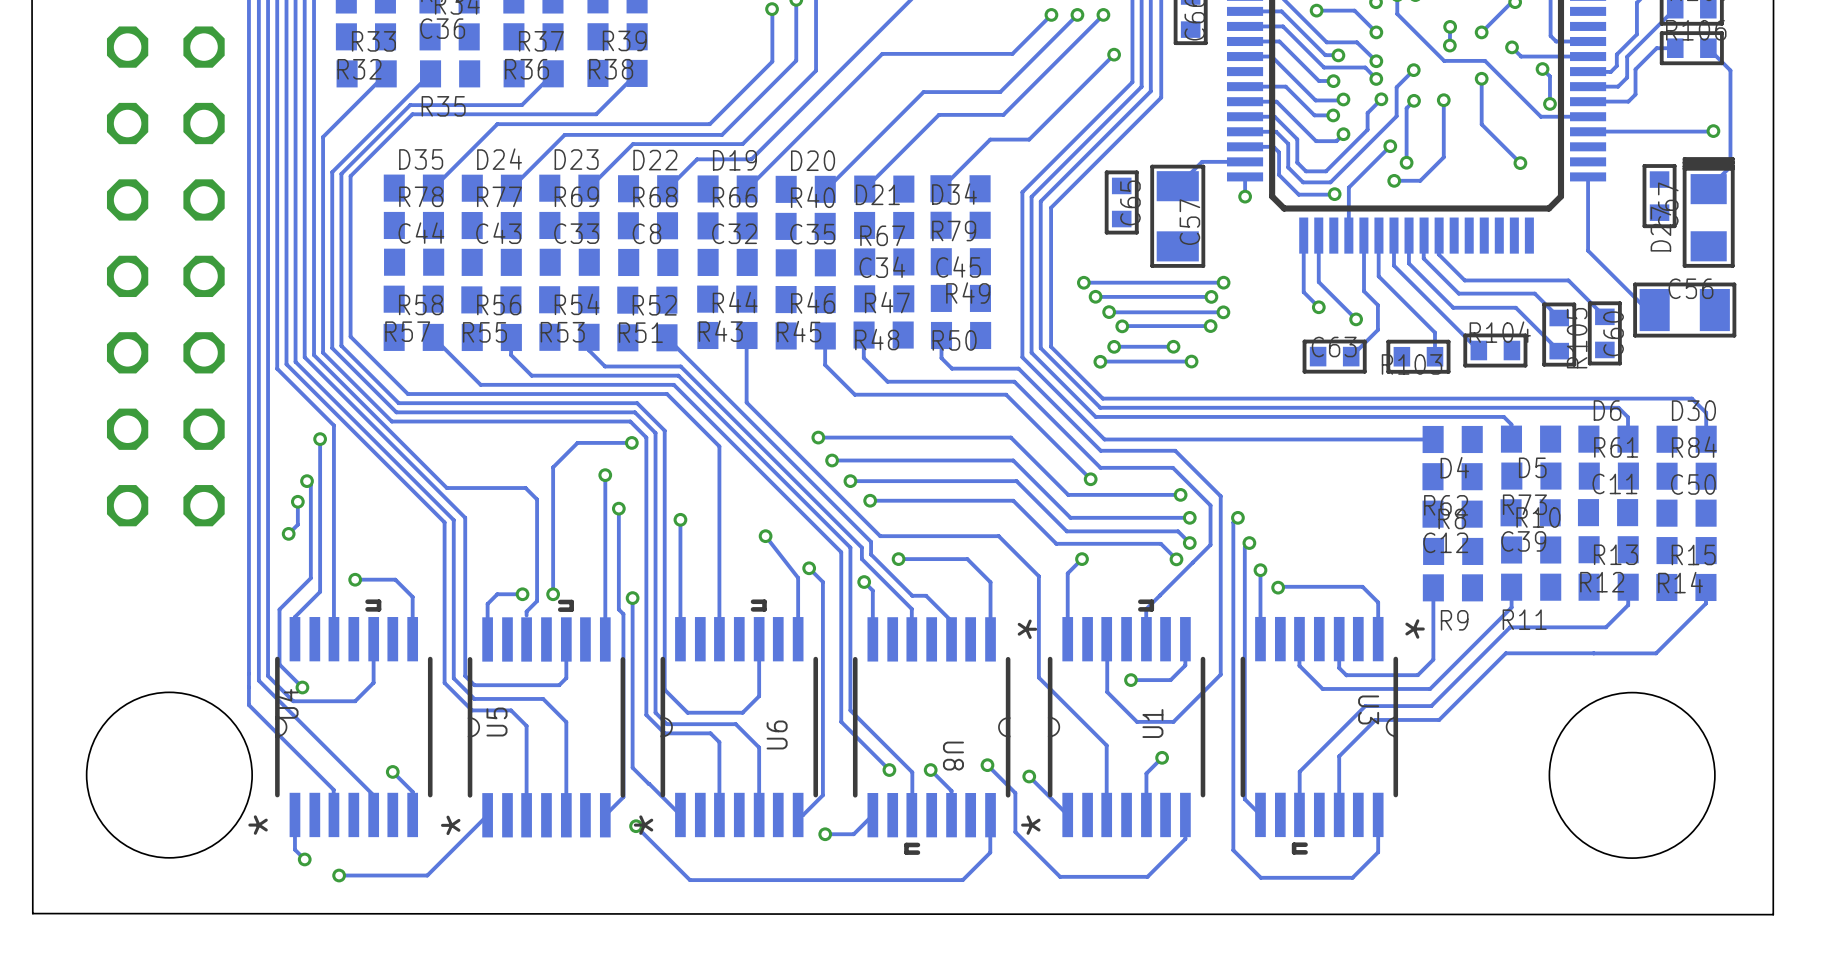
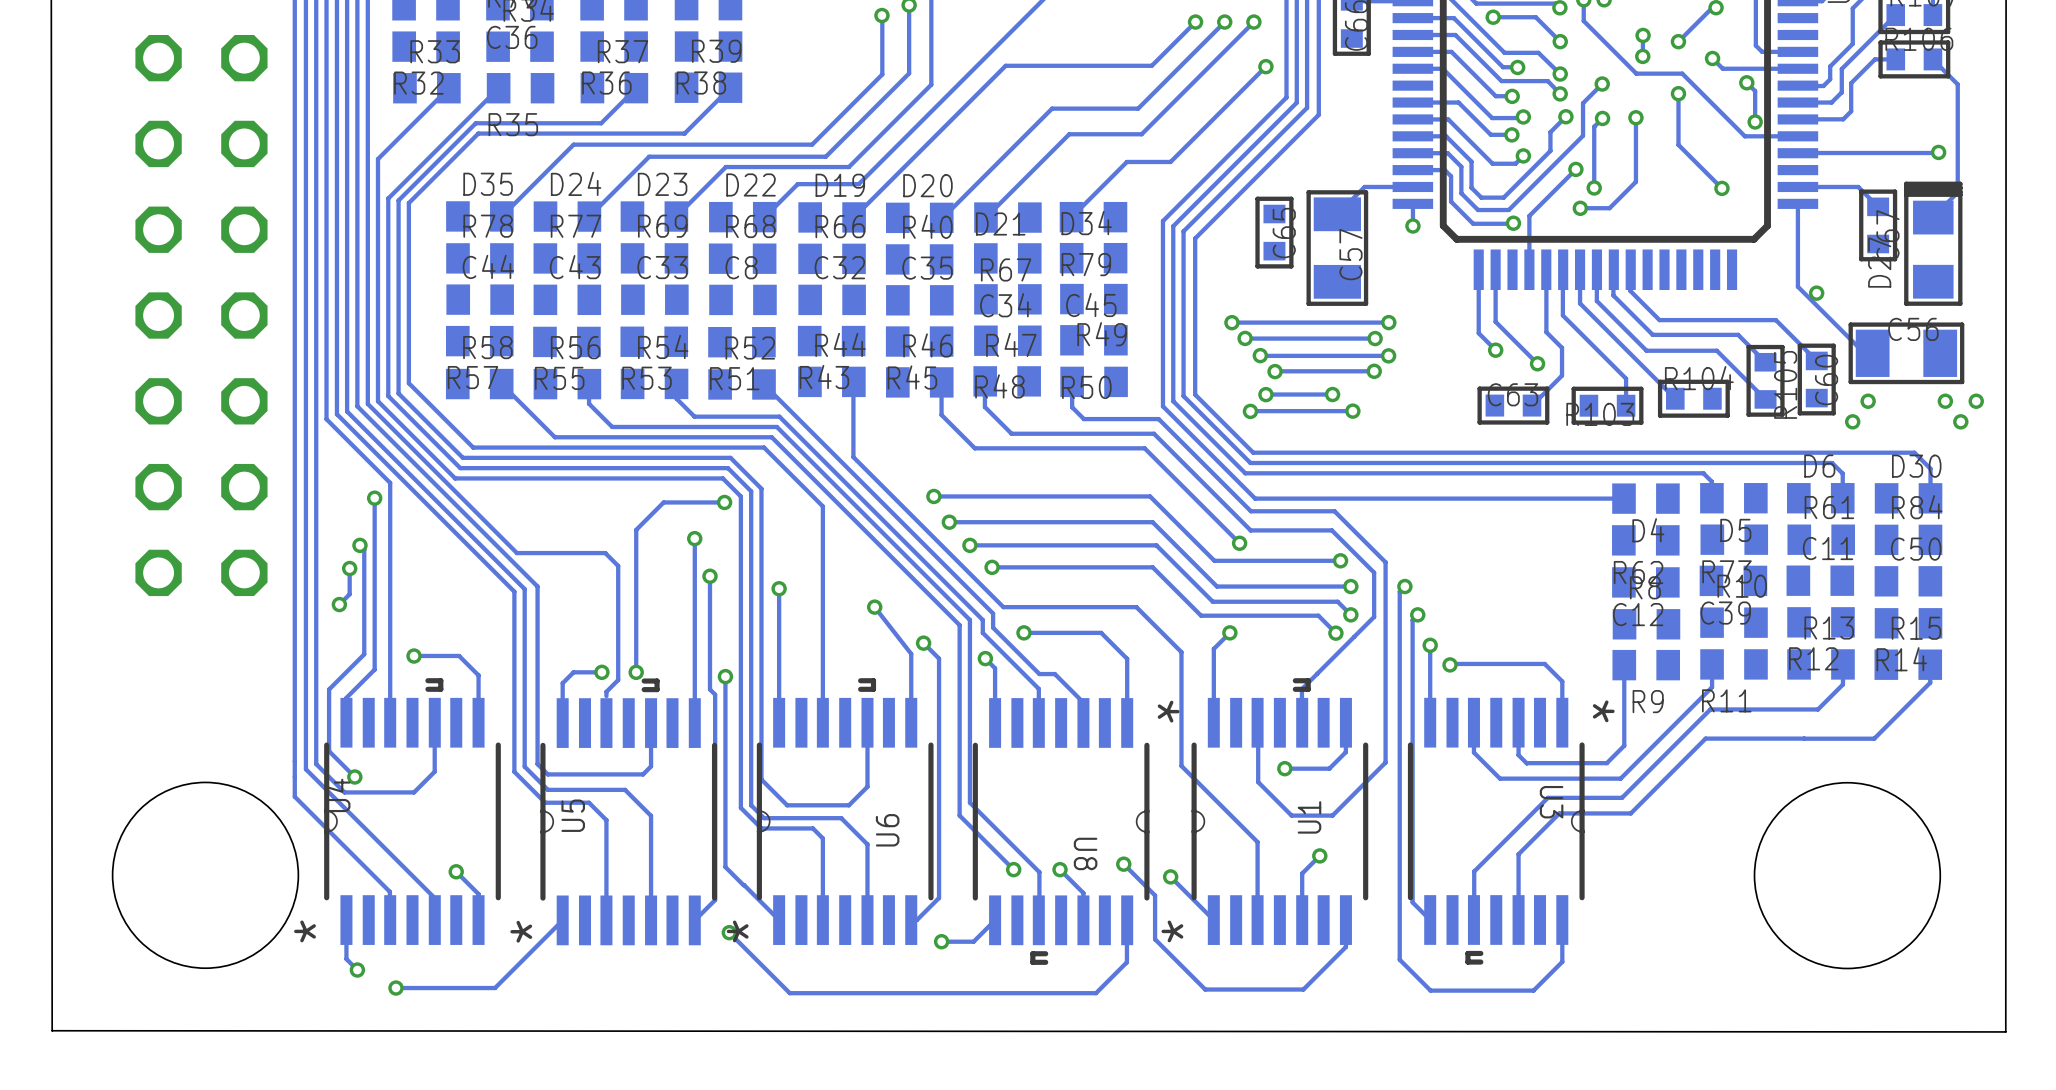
track: none -> (1797, 186) (1858, 186) (1878, 206)
via: none -> (1816, 293)
via: none -> (1868, 401)
via: none -> (1945, 401)
via: none -> (1976, 401)
via: none -> (1852, 421)
via: none -> (1960, 421)

